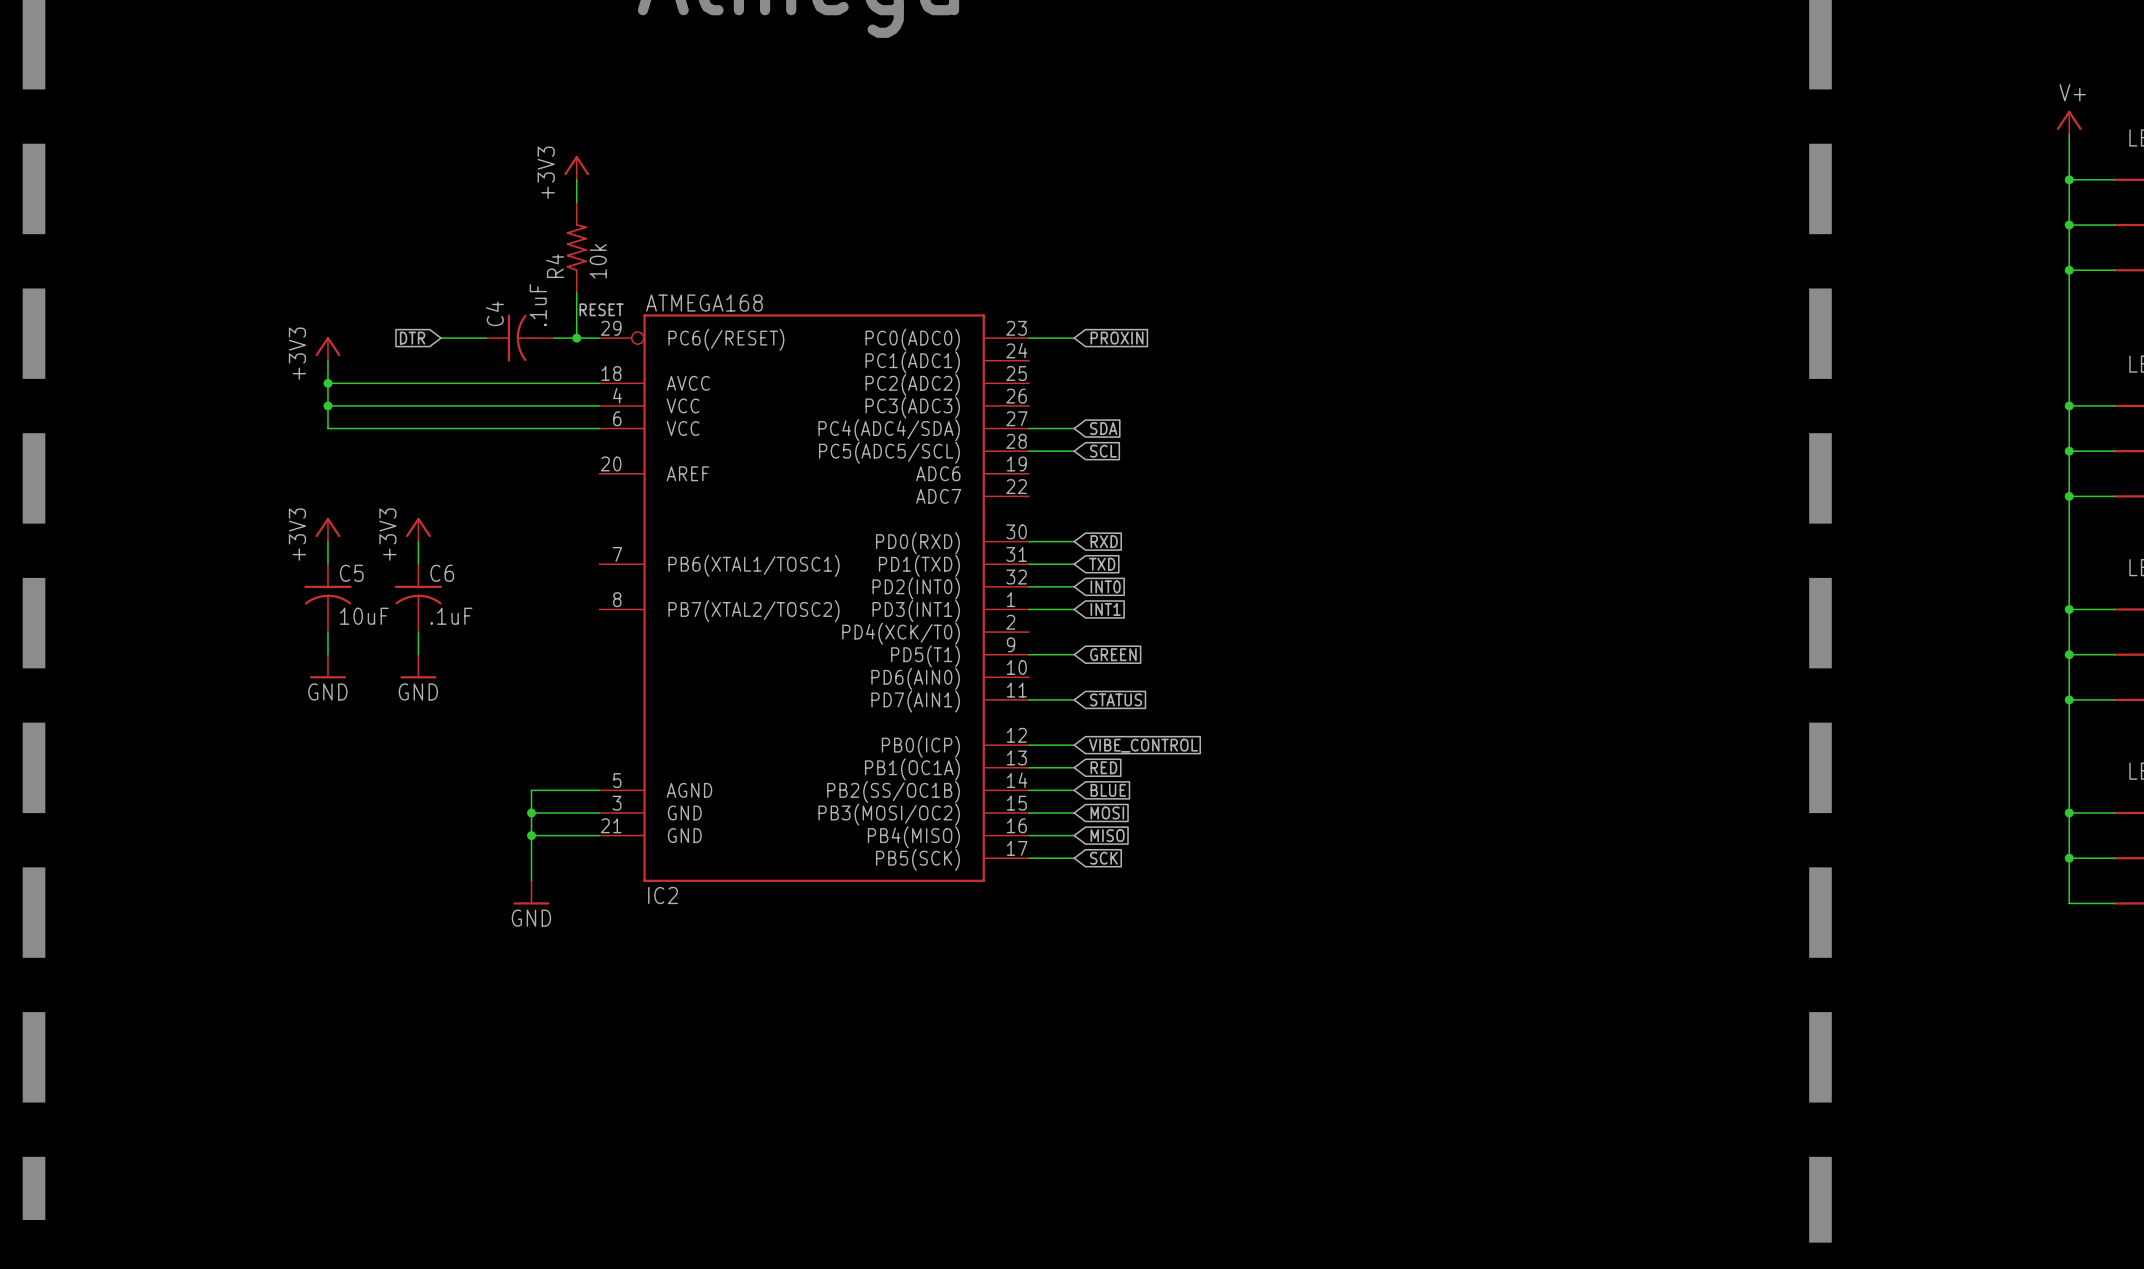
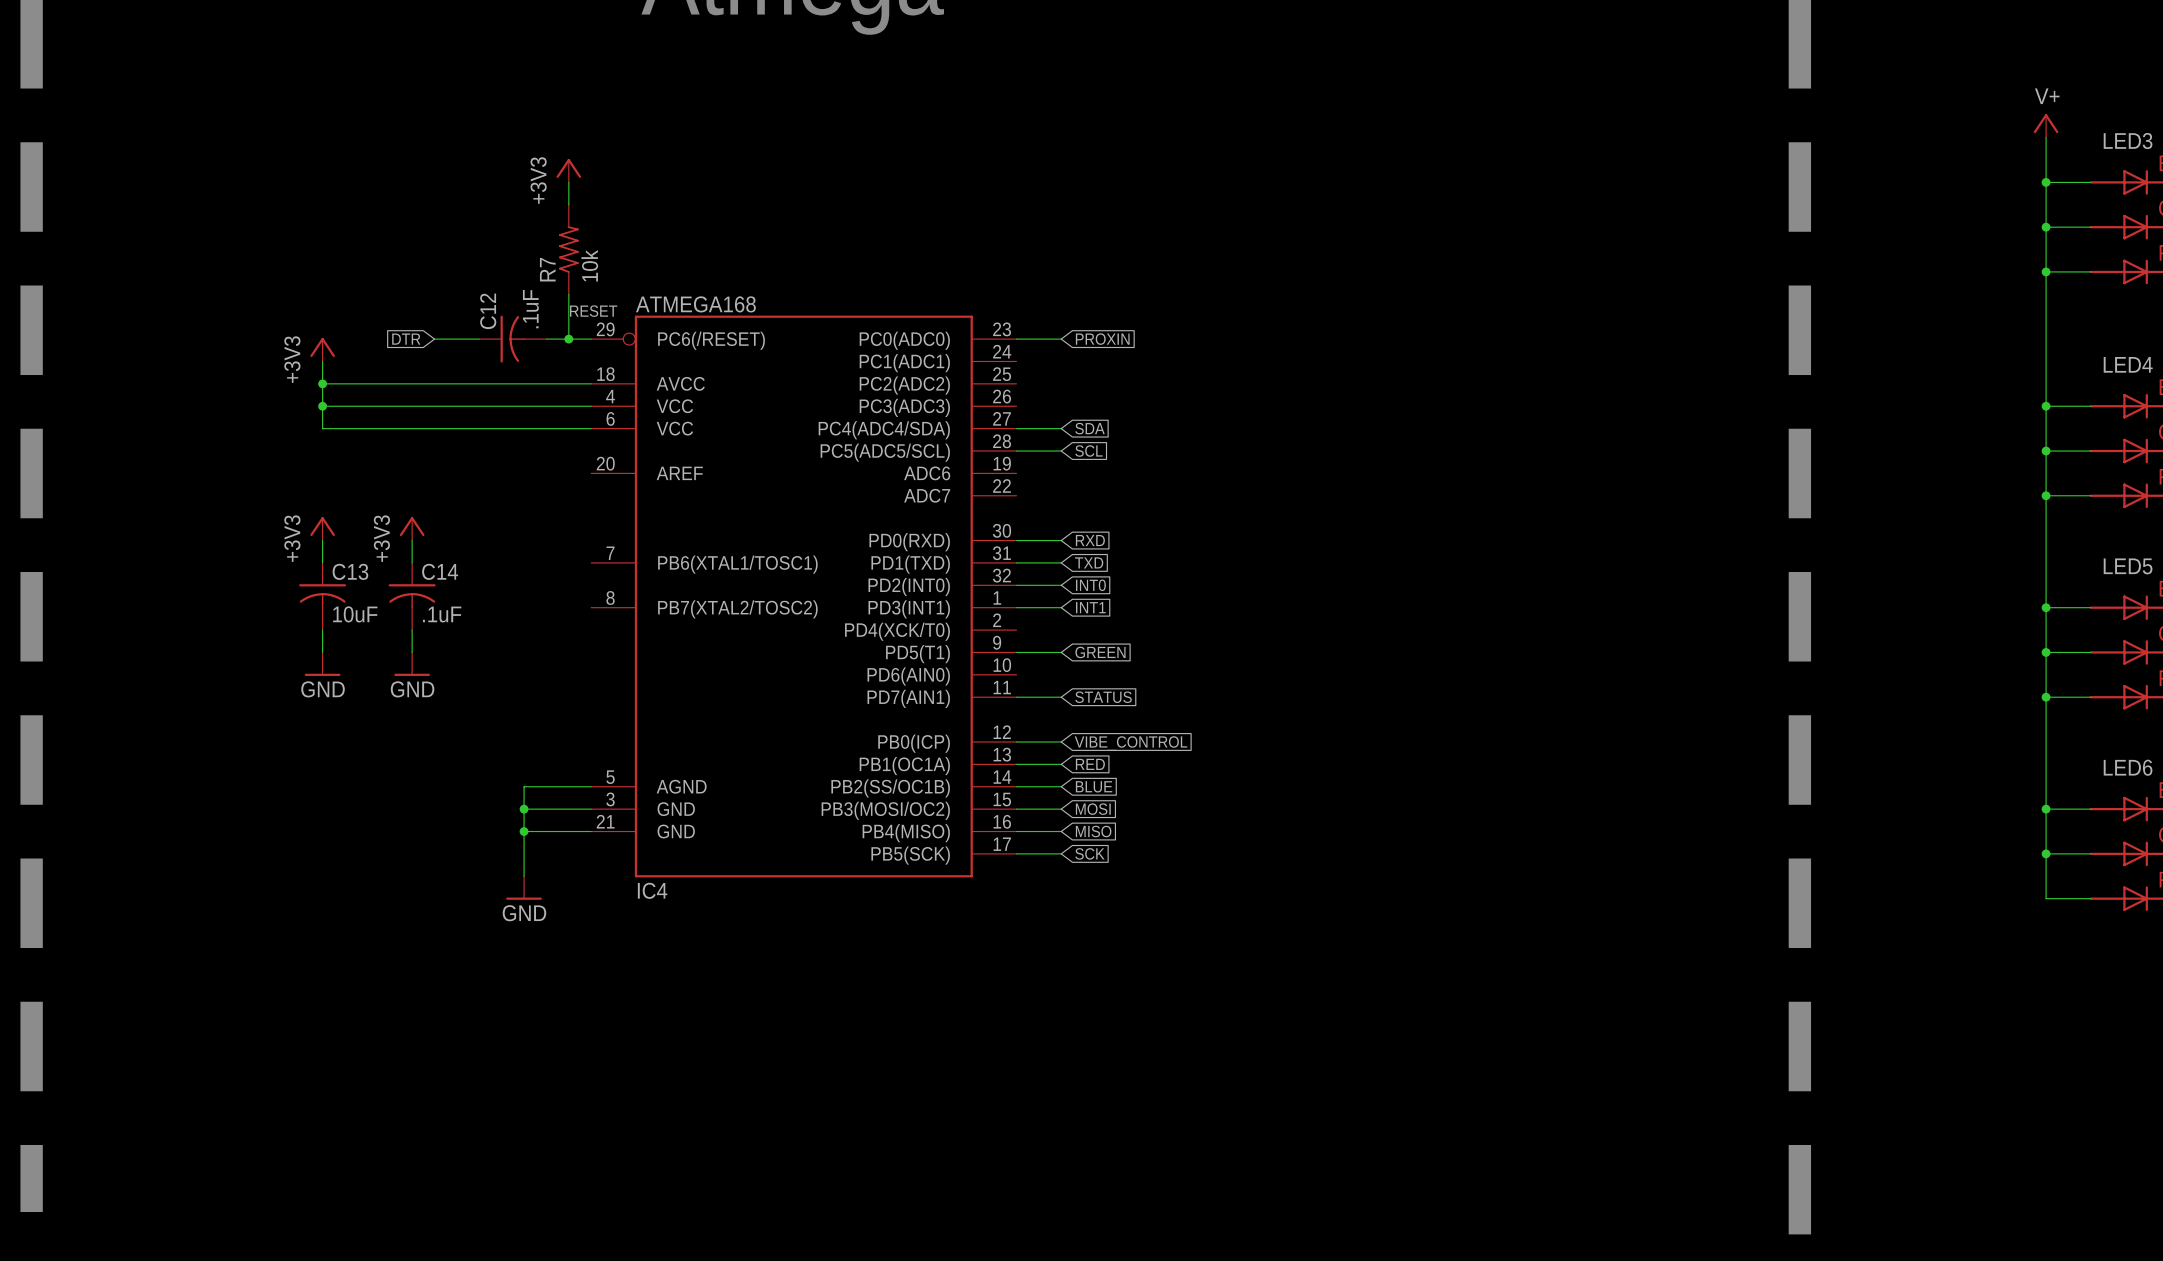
R4 name: R4 (555, 266) -> R7 (547, 269)
C4 name: C4 (494, 313) -> C12 (488, 311)
C5 name: C5 (351, 573) -> C13 (350, 571)
C6 name: C6 (442, 573) -> C14 (440, 571)
IC2 name: IC2 (663, 895) -> IC4 (652, 890)

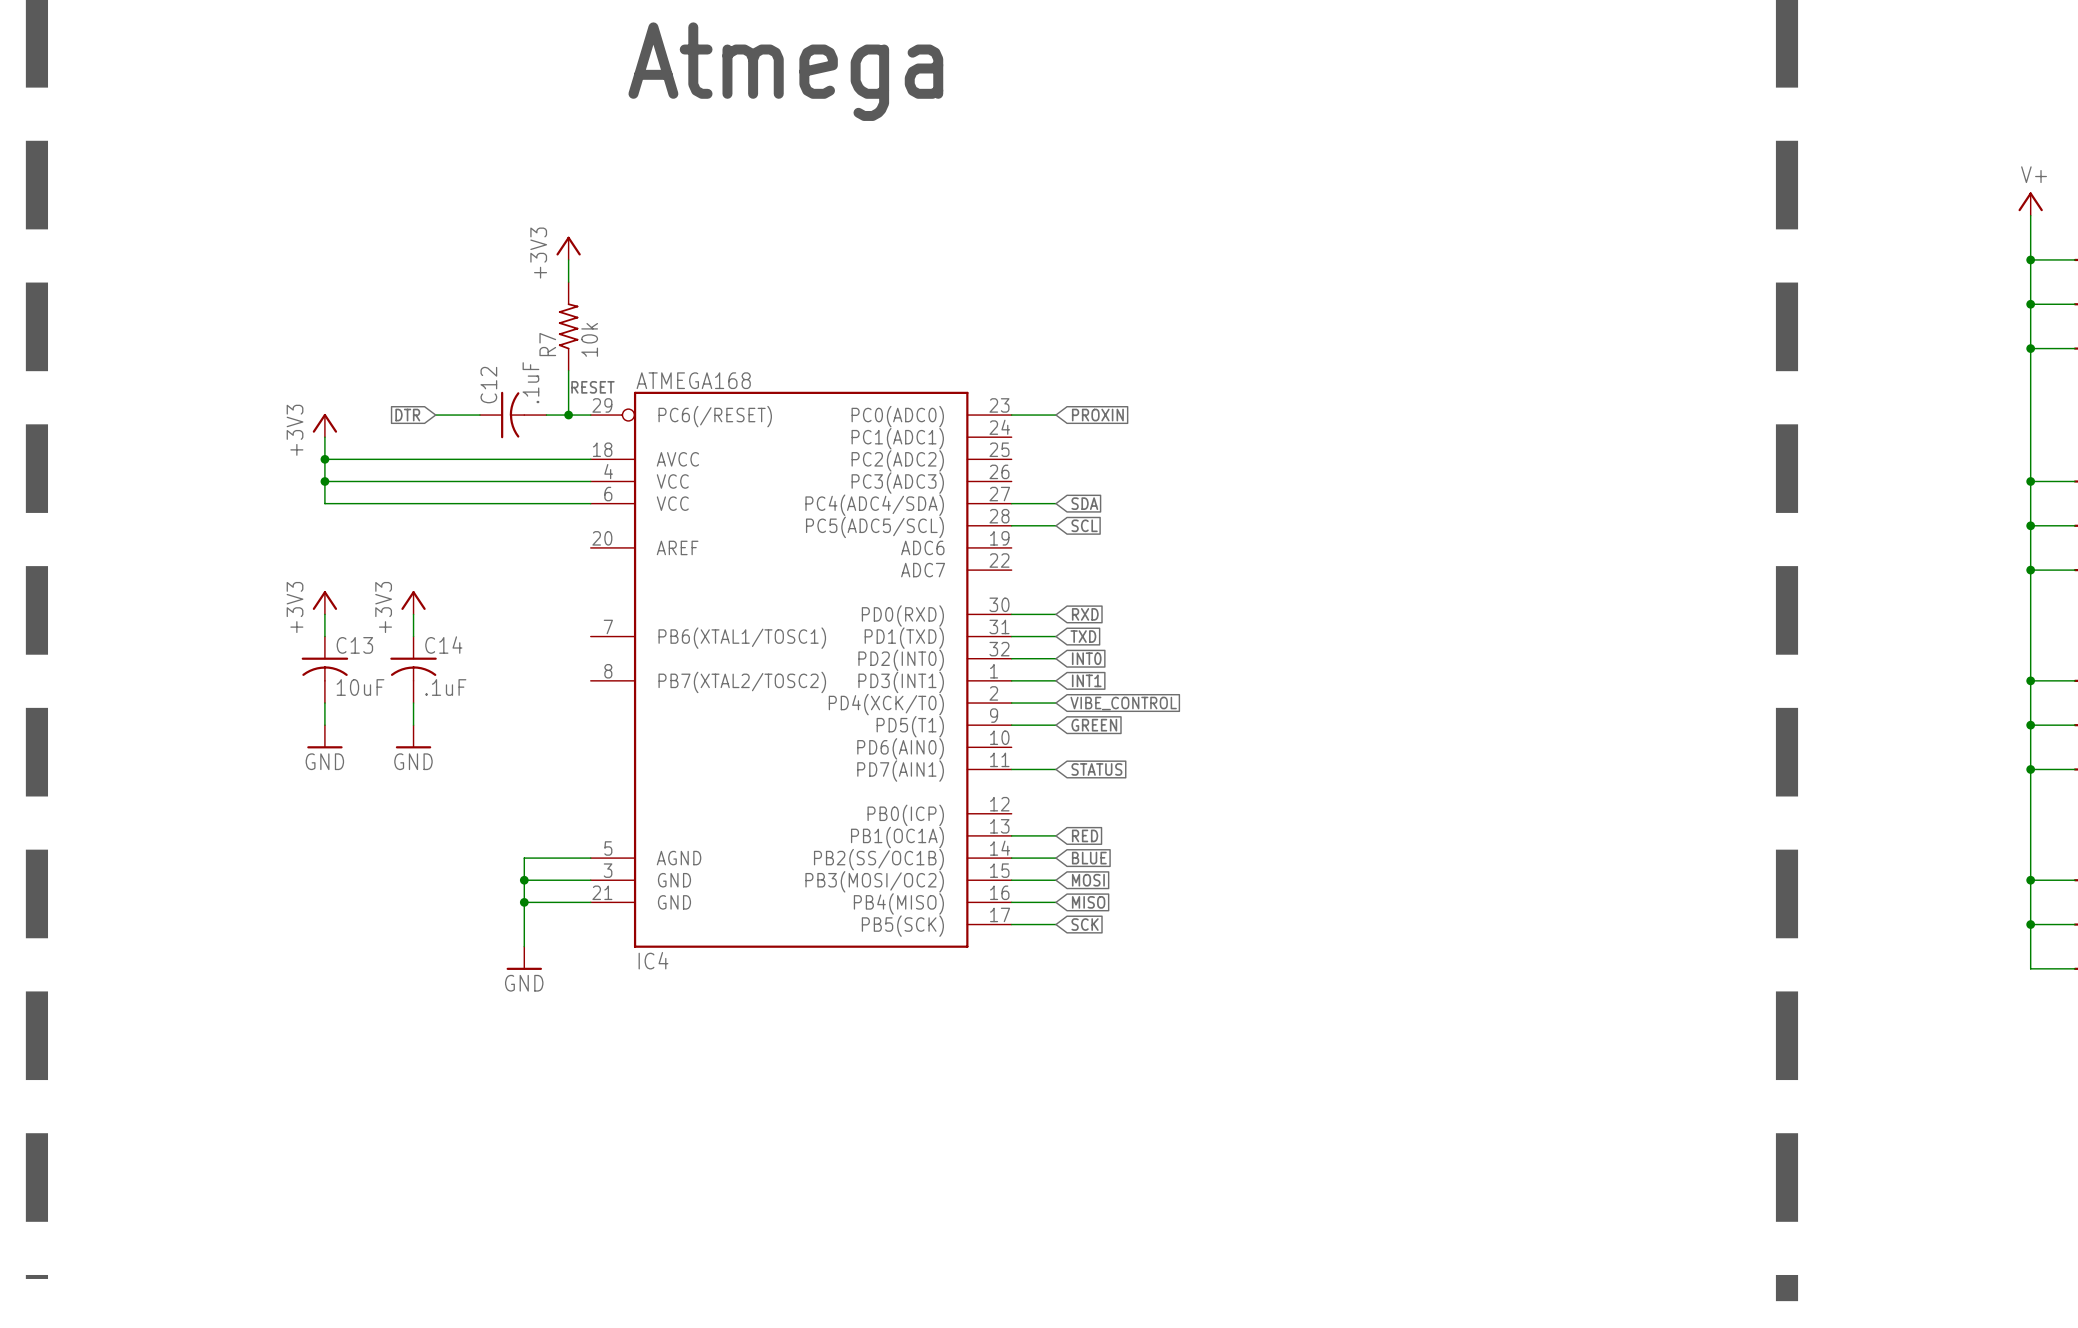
wire: (1016, 741) (1061, 741) -> (1011, 703) (1055, 703)
global label position: VIBE_CONTROL (1131, 743) -> VIBE_CONTROL (1123, 703)

